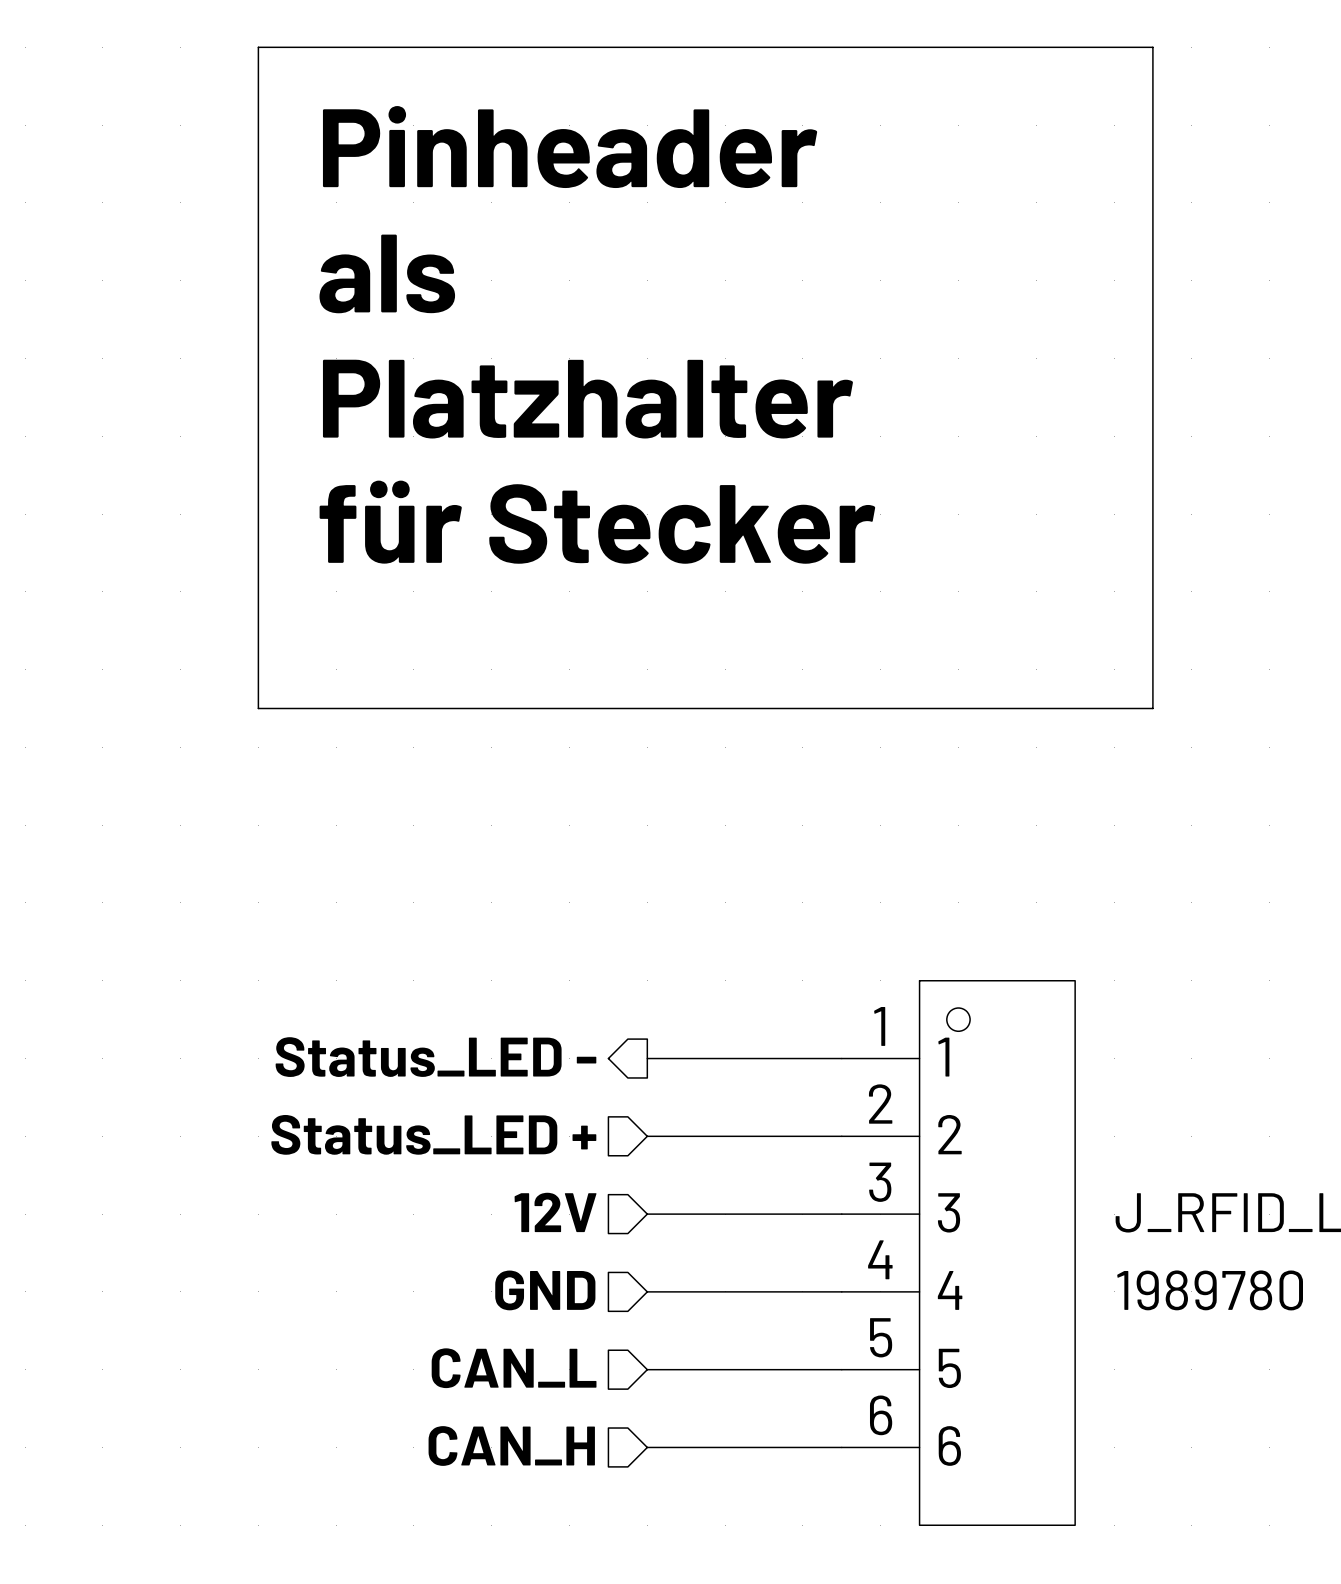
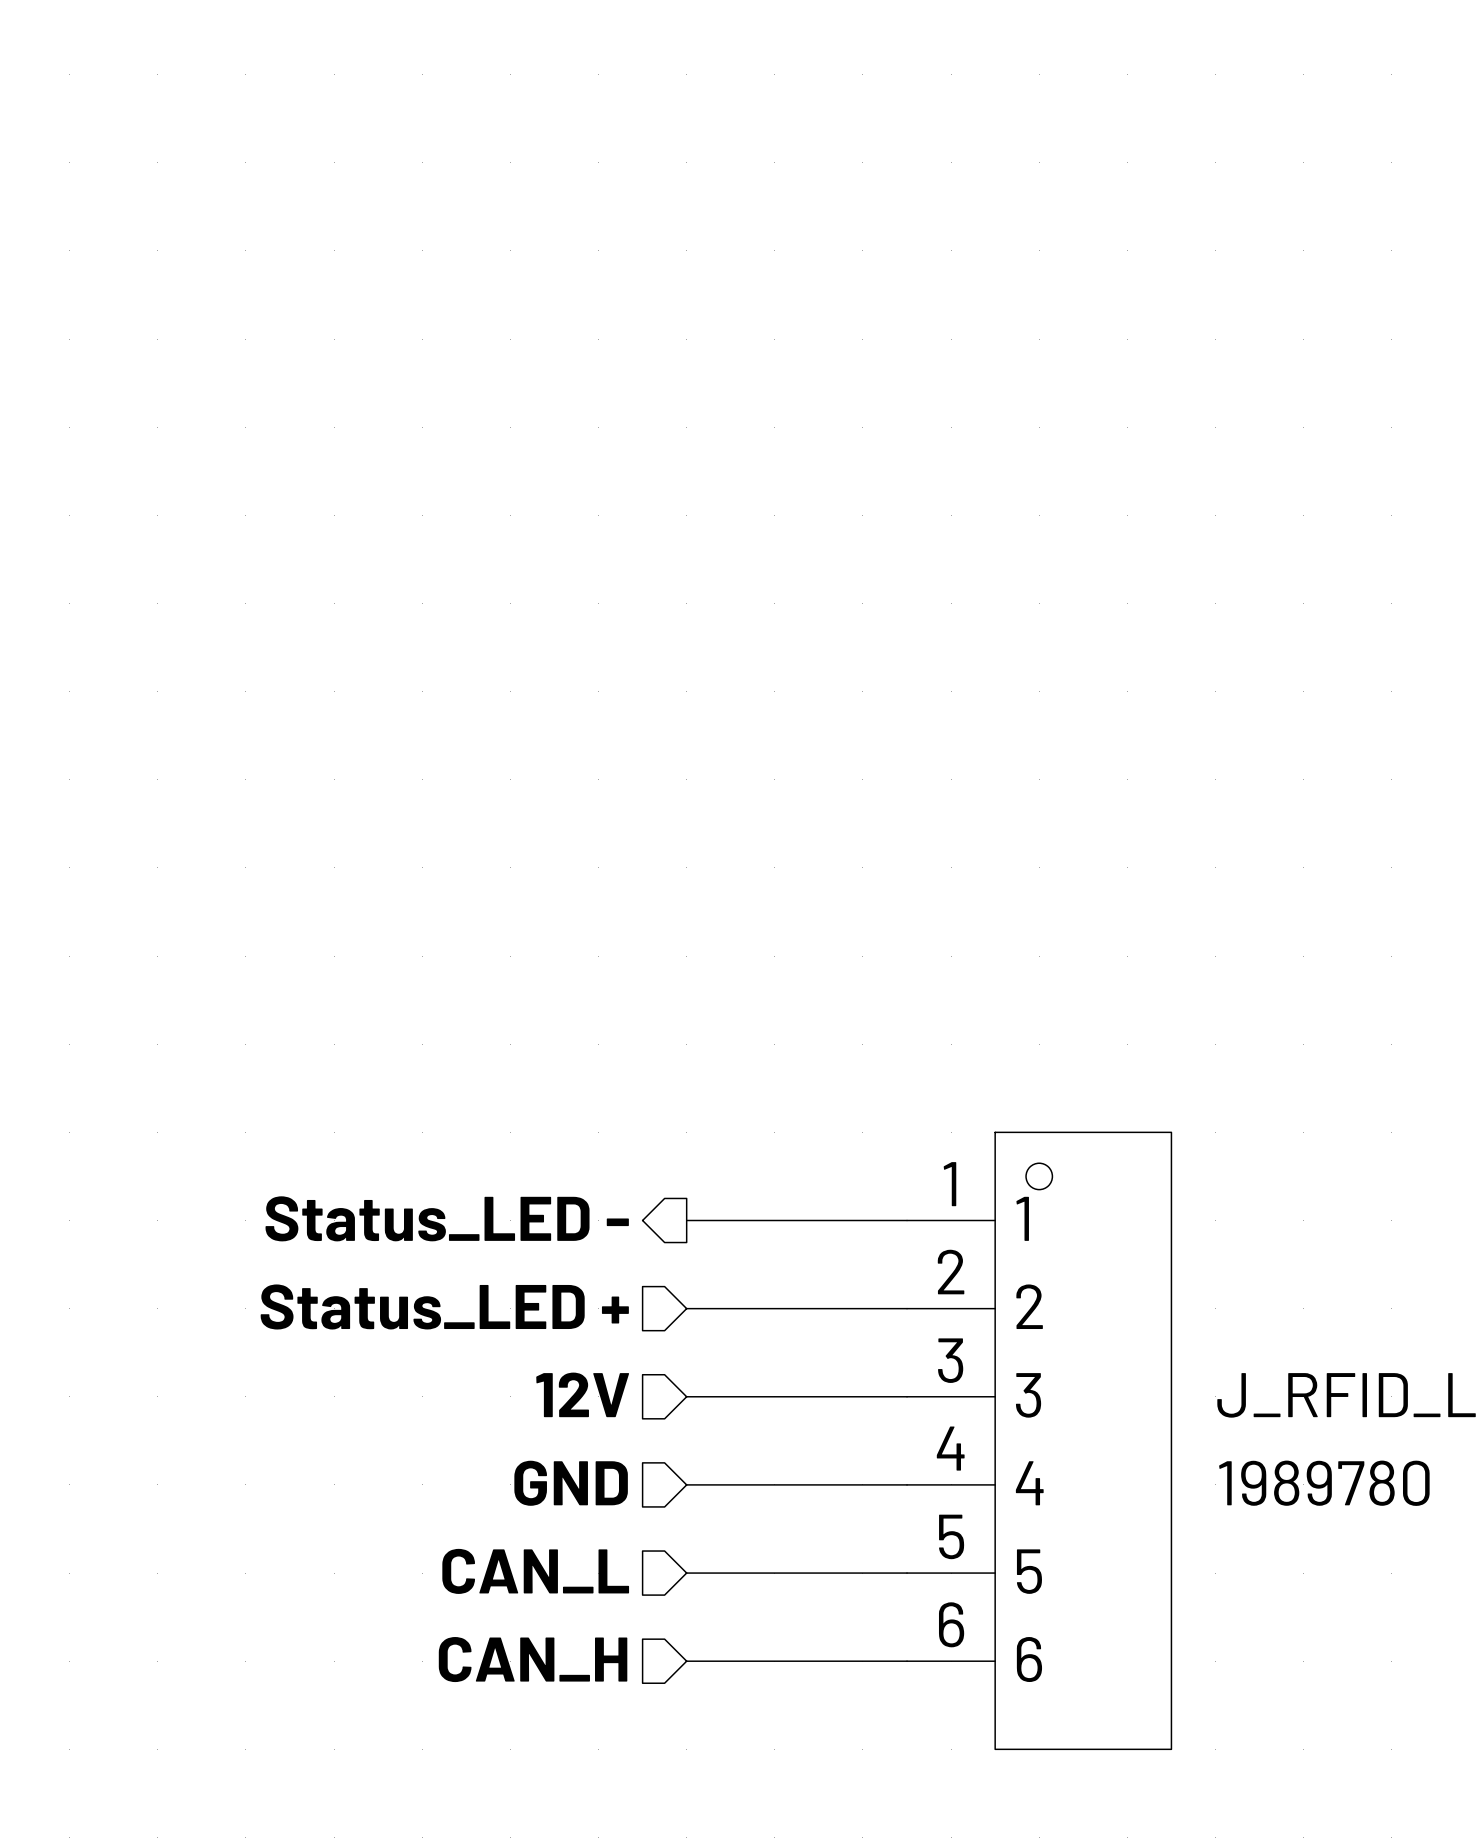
line: (258, 47) (1152, 47) (1152, 708) (258, 708) (258, 47) -> none
text: Pinheader (570, 147) -> none
text: als (387, 273) -> none
text: Platzhalter (588, 399) -> none
text: für Stecker (597, 522) -> none

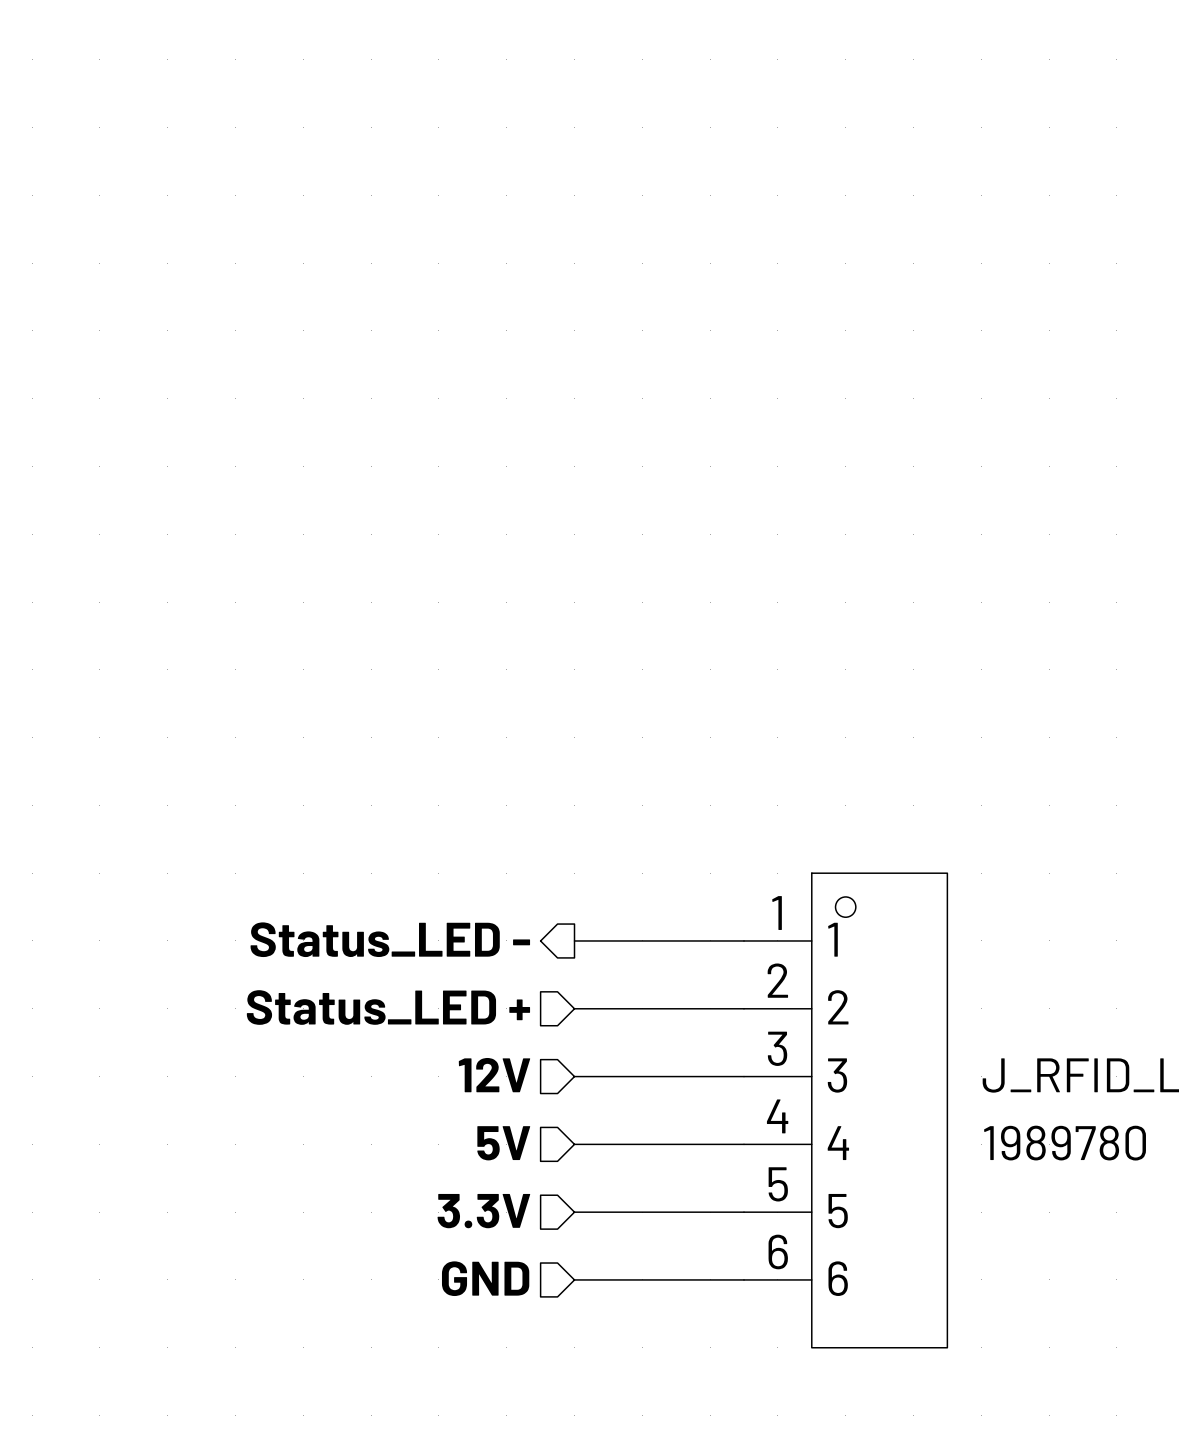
hierarchical label: GND (571, 1483) -> 5V (503, 1143)
hierarchical label: CAN_L (535, 1571) -> 3.3V (483, 1211)
hierarchical label: CAN_H (533, 1659) -> GND (485, 1278)

